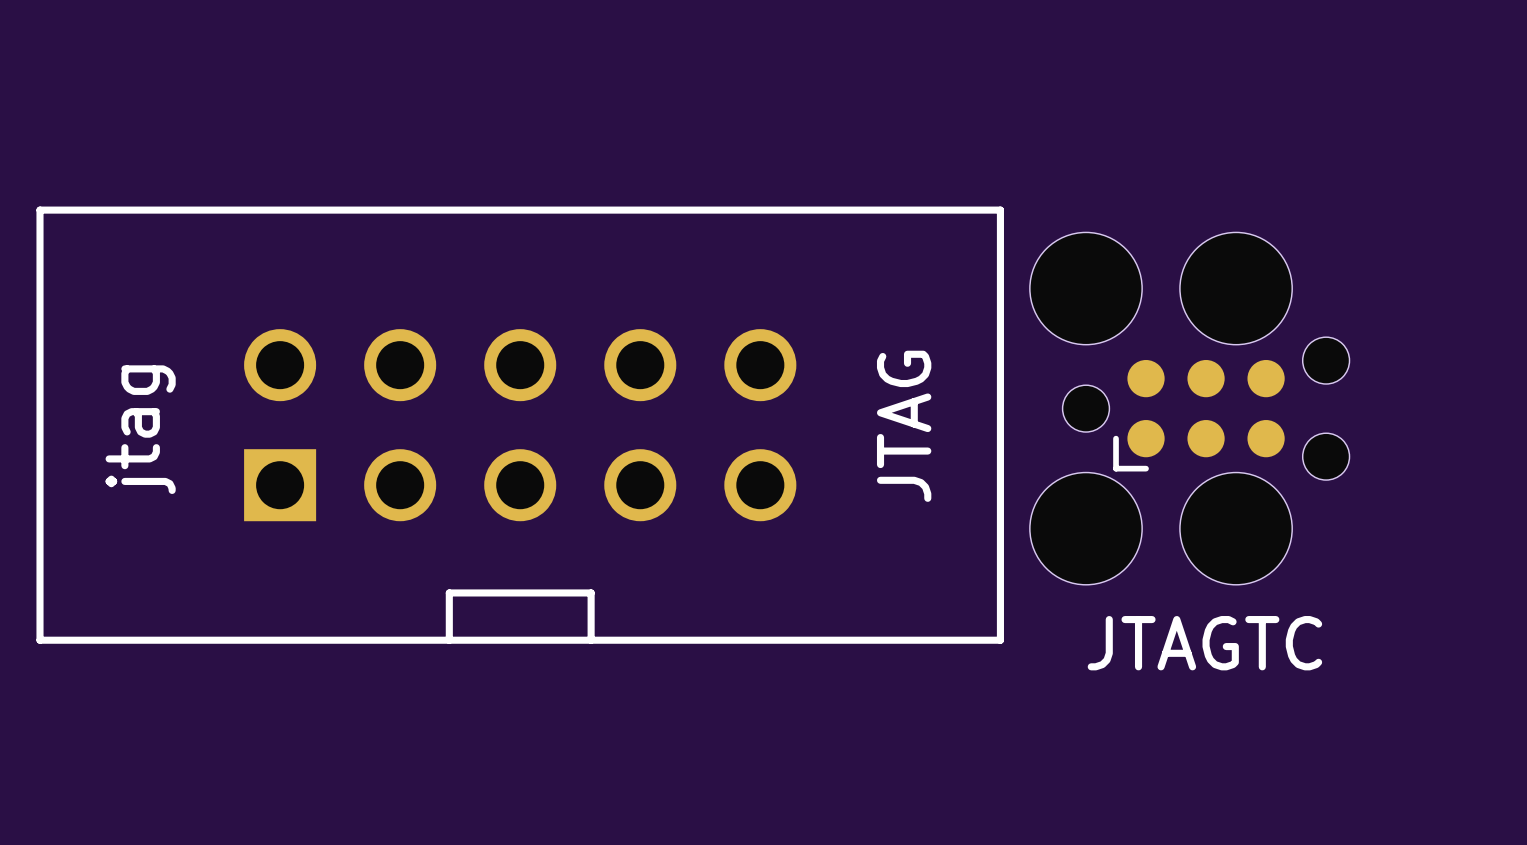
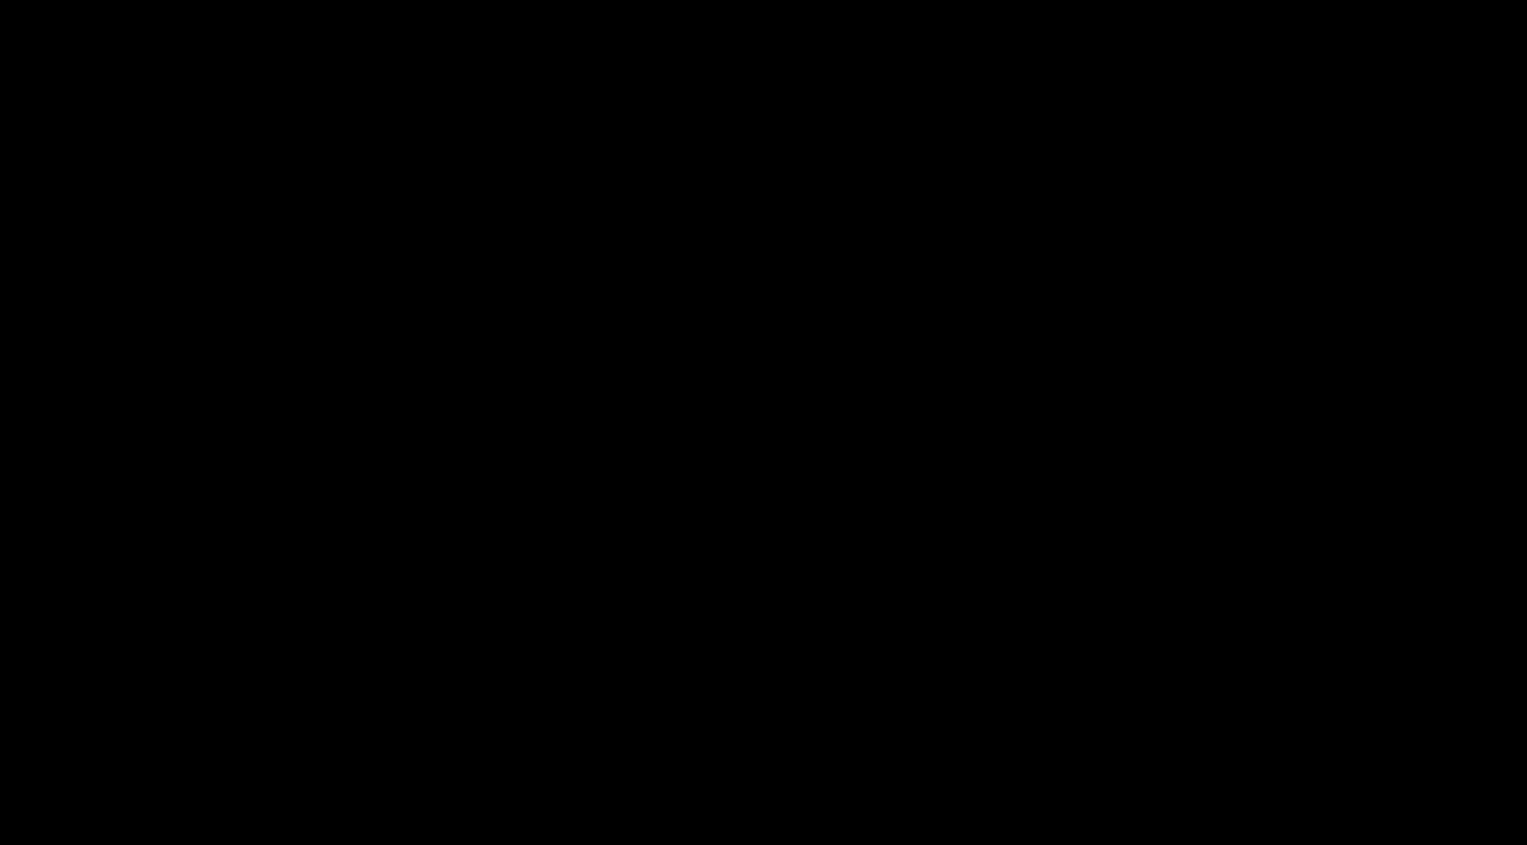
JTAGTC: (1189, 408) -> none
JTAG: jtag (520, 425) -> none

